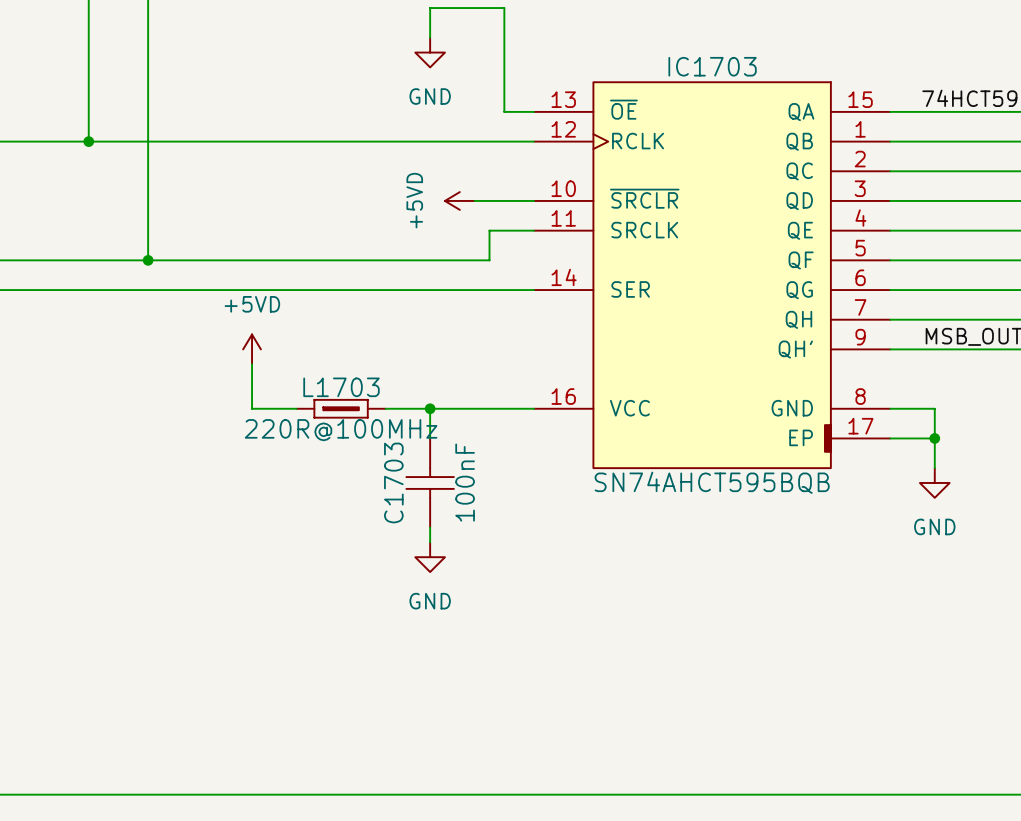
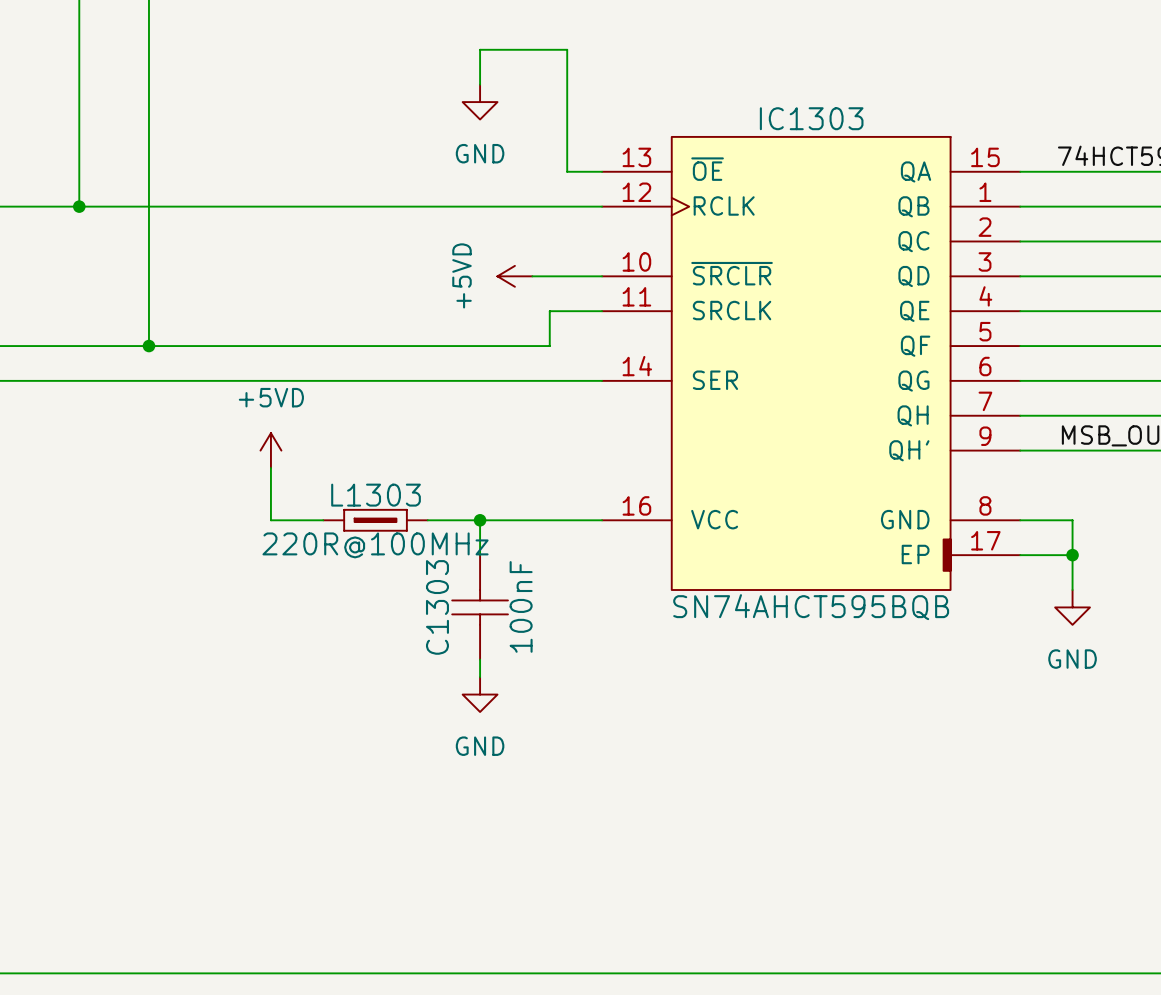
IC1703 name: IC1703 (712, 66) -> IC1303 (811, 118)
L1703 name: L1703 (341, 387) -> L1303 (376, 495)
C1703 name: C1703 (393, 482) -> C1303 (437, 607)

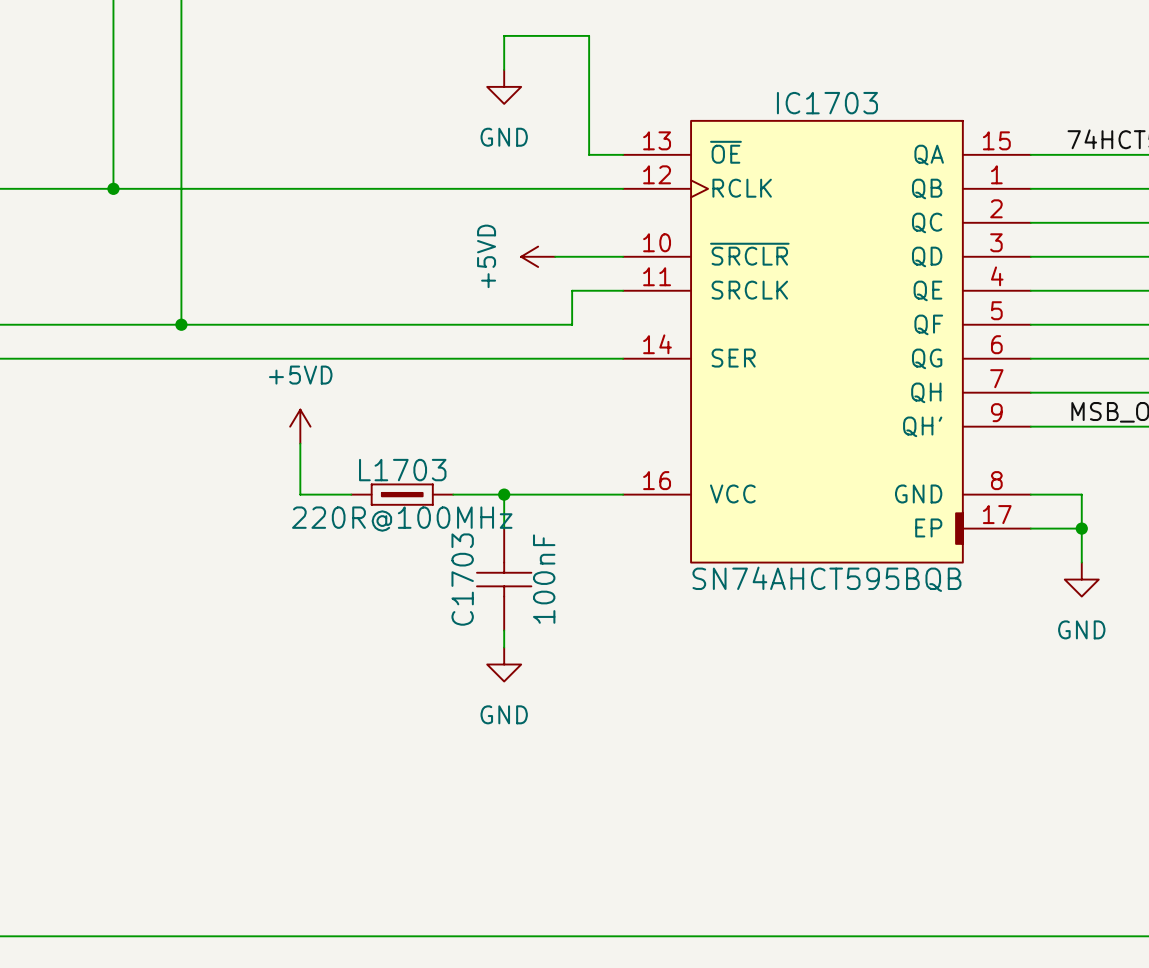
IC1303 name: IC1303 (811, 118) -> IC1703 (827, 103)
L1303 name: L1303 (376, 495) -> L1703 (402, 470)
C1303 name: C1303 (437, 607) -> C1703 (462, 579)

